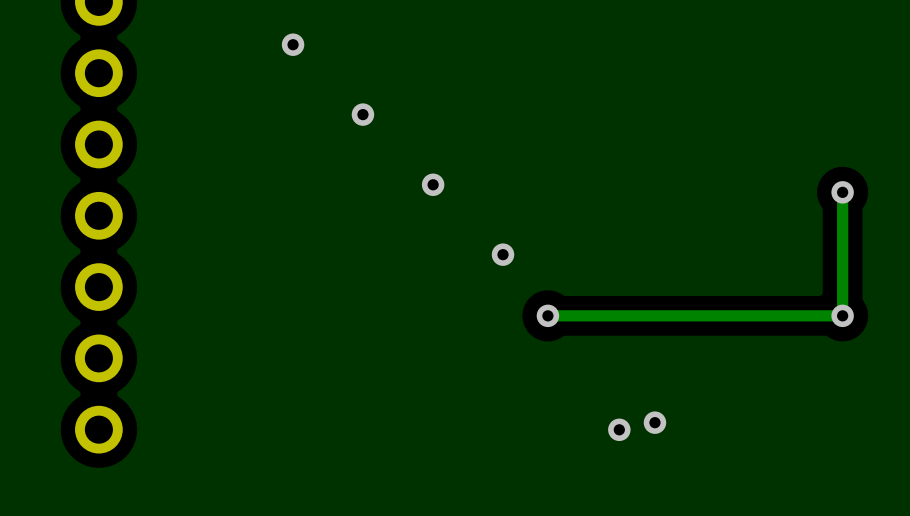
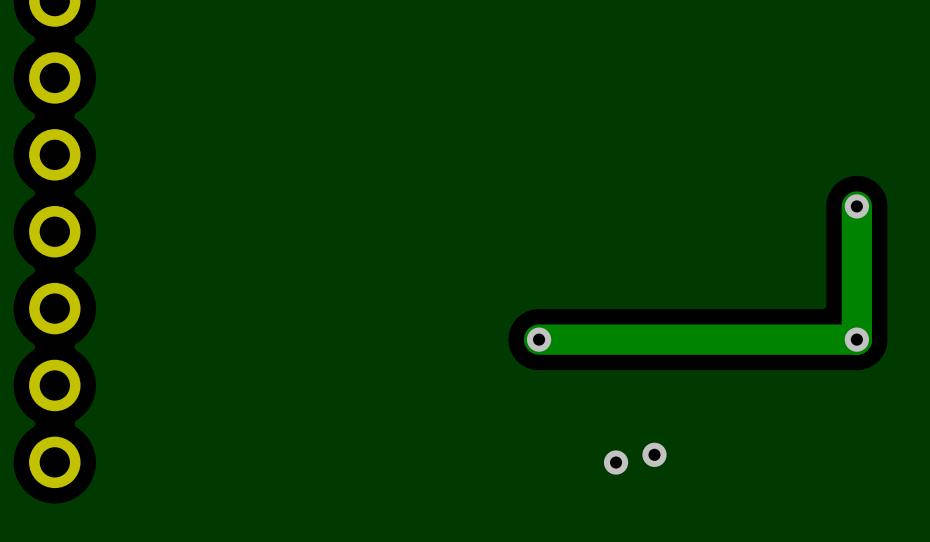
via: (293, 44) -> none
via: (362, 114) -> none
via: (433, 184) -> none
track width: thin (842, 192) (842, 315) (547, 315) -> thick (856, 206) (856, 339) (539, 339)
via: (503, 254) -> none

